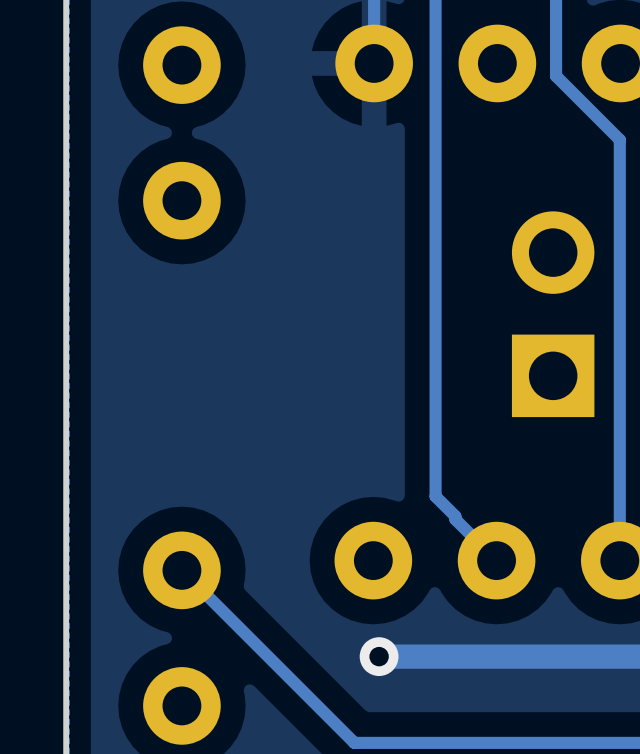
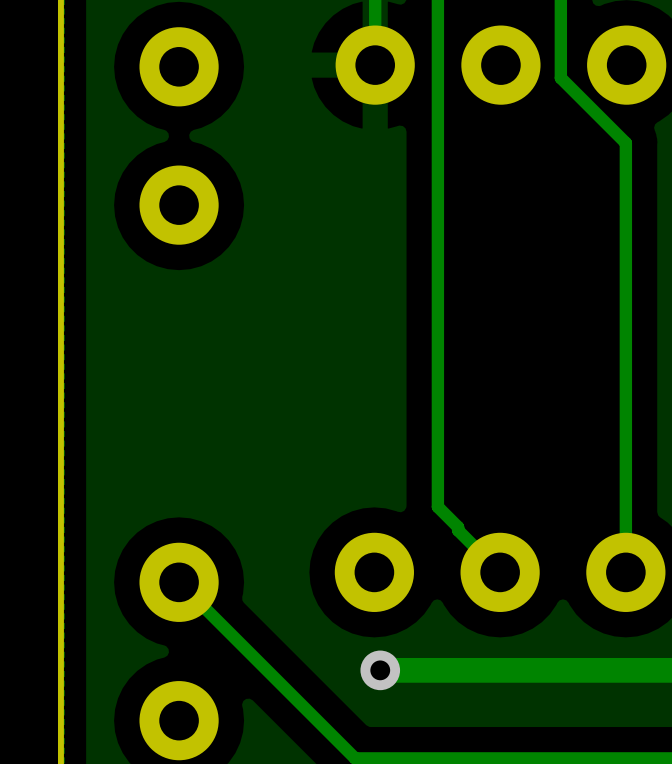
part: (553, 314) -> none

